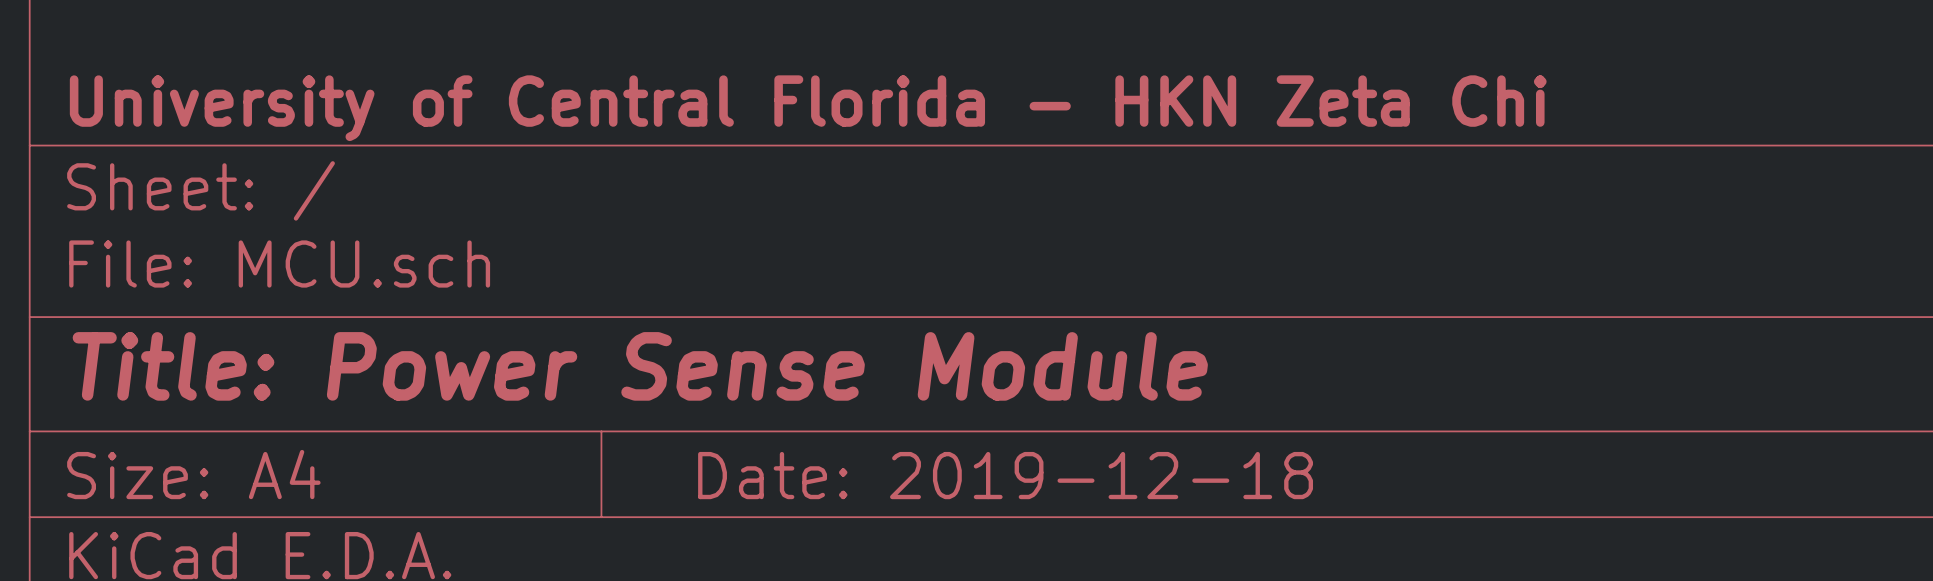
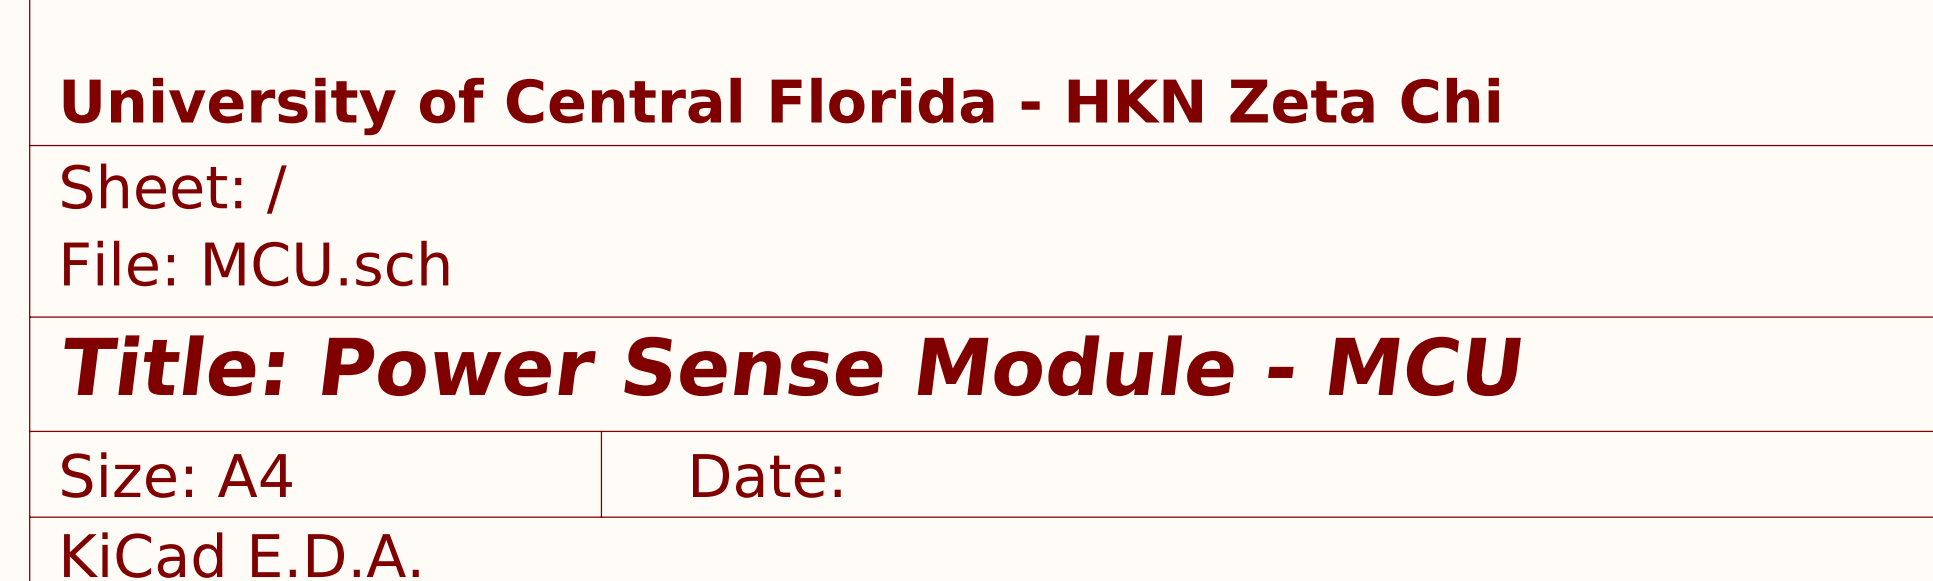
title block: Title: Power Sense Module (640, 366) -> Title: Power Sense Module - MCU (792, 365)
title block: Date: 2019-12-18 (1005, 475) -> Date: (766, 475)

